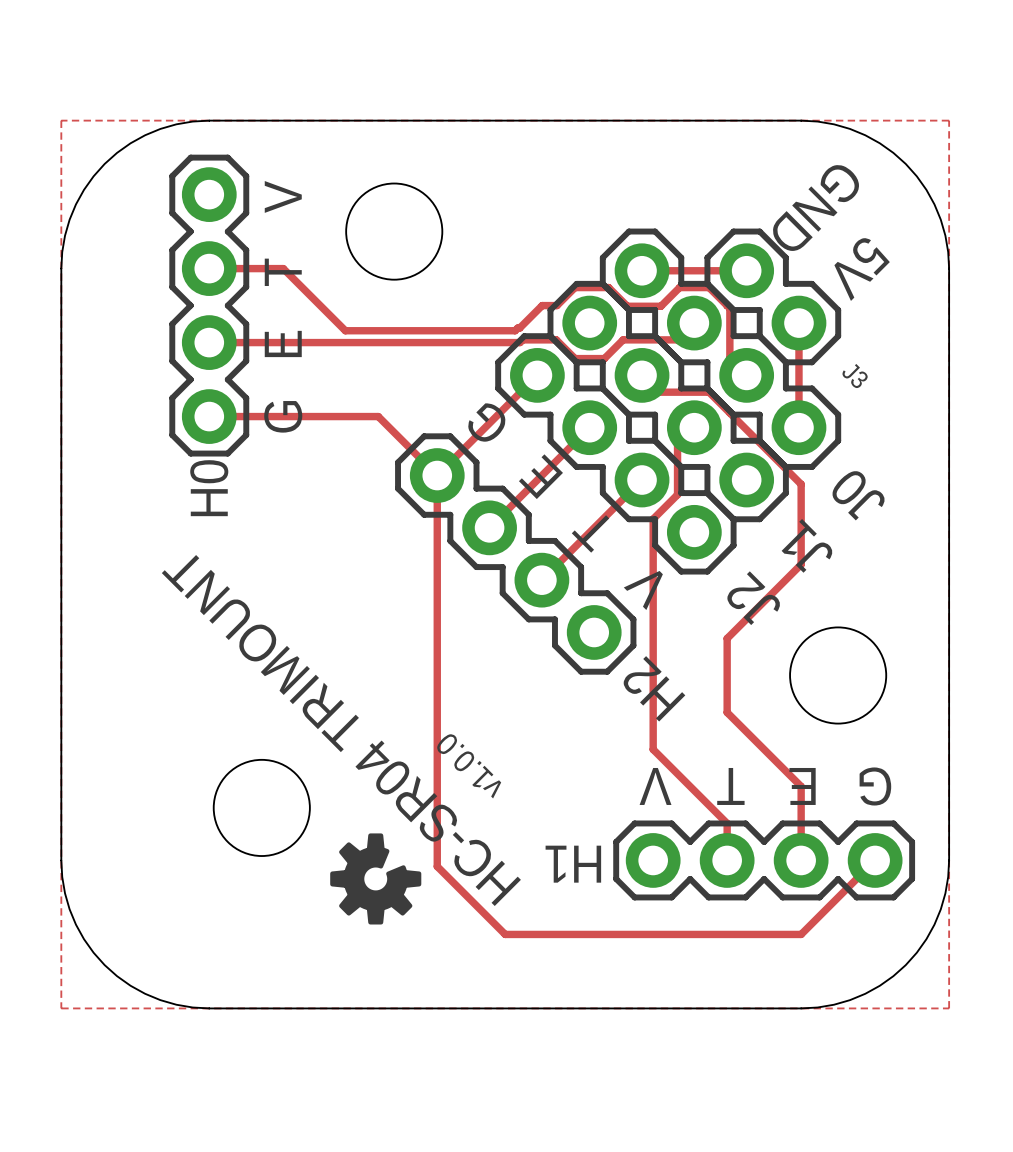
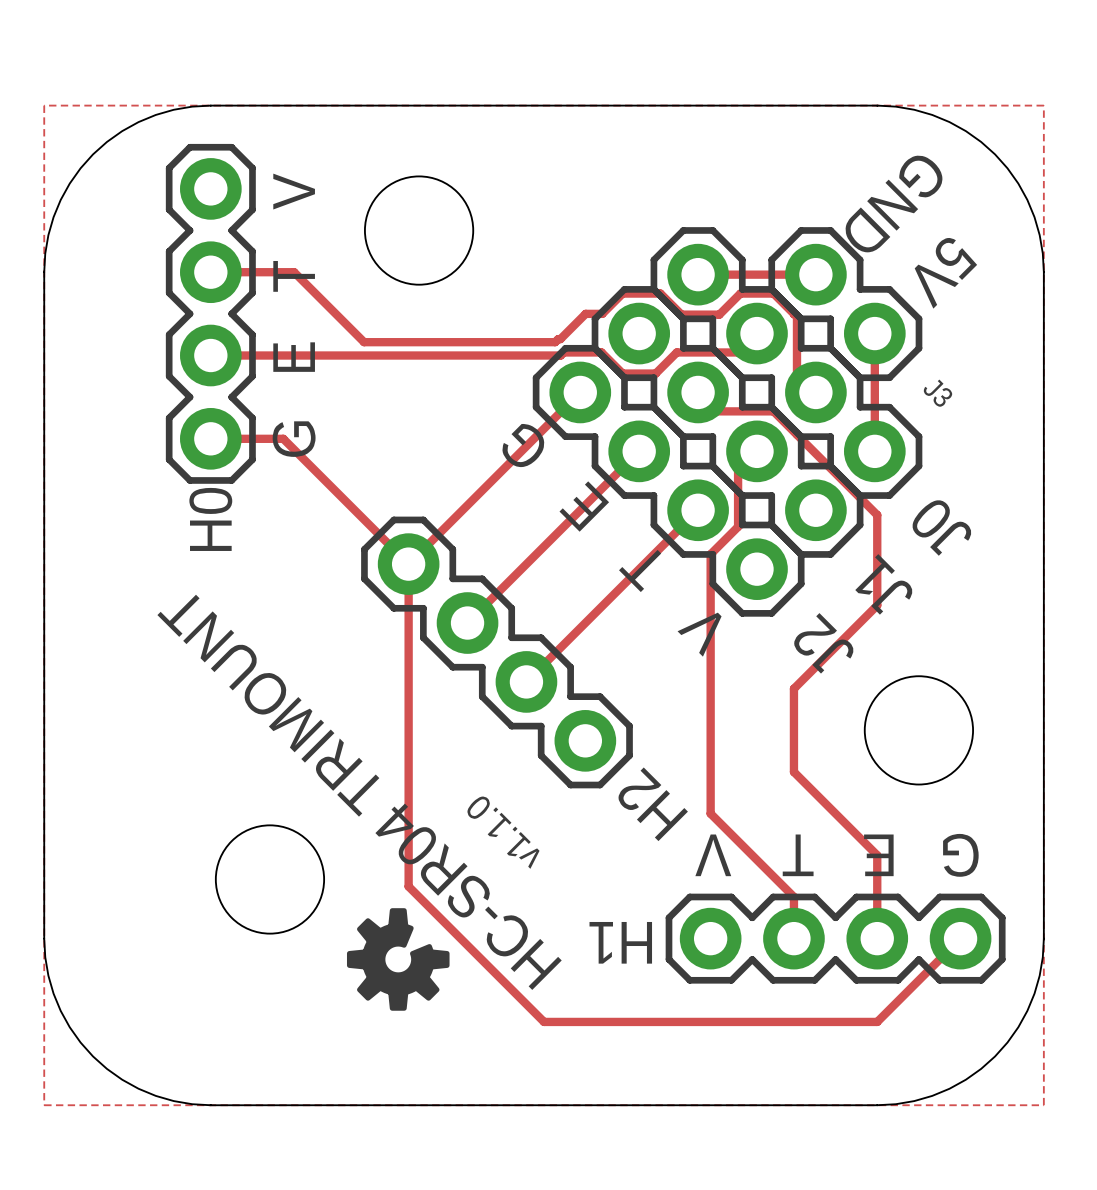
track: (273, 416) (378, 416) (437, 475) (437, 866) -> (408, 564) (408, 886) (467, 945)
track: none -> (283, 438) (408, 564)
track: none -> (467, 505) (408, 564)
track: none -> (526, 564) (467, 623)
part position: (515, 554) -> (496, 652)
track: none -> (585, 623) (526, 681)
text: v1.0.0 (468, 766) -> v1.1.0 (503, 832)

